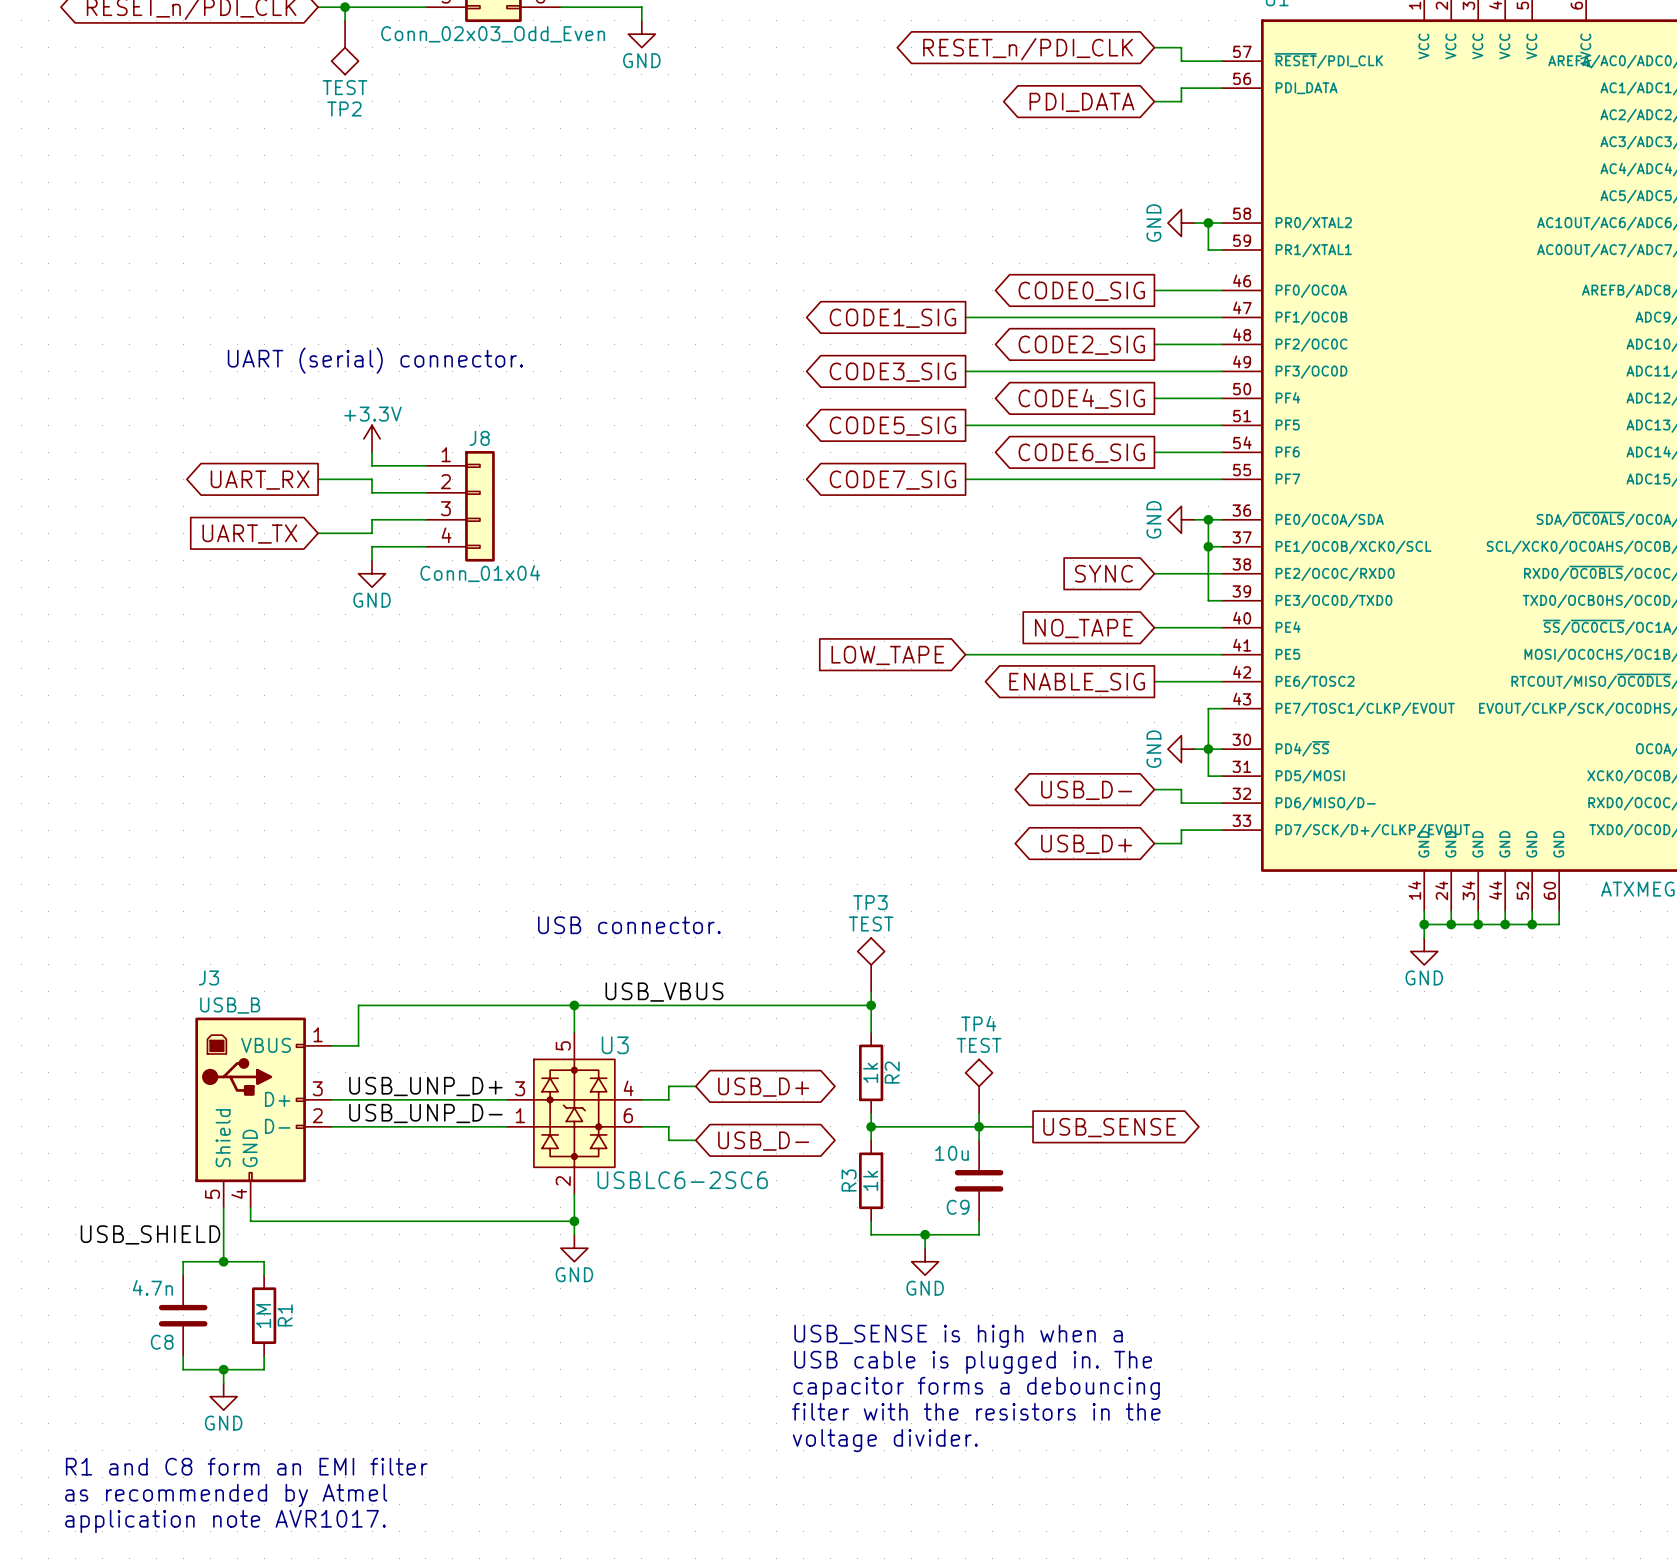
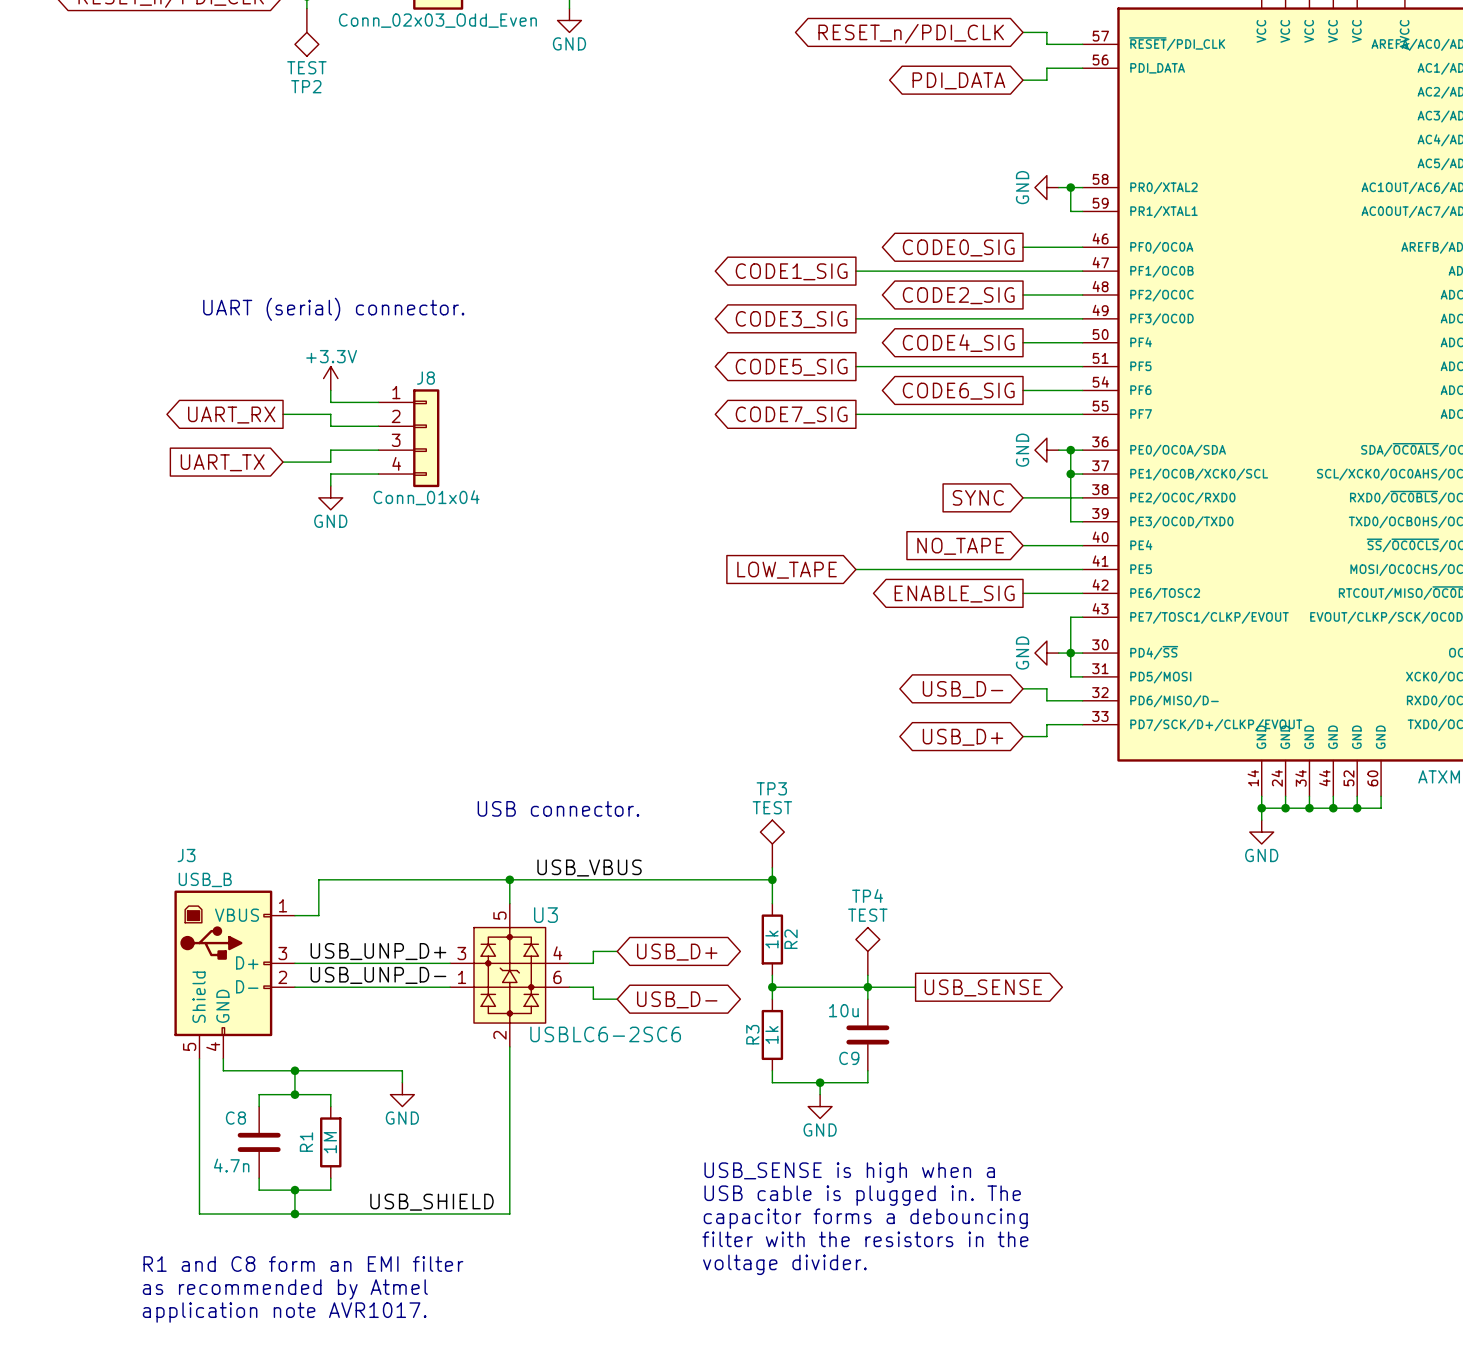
wire: none -> (294, 1070) (294, 1094)
junction: none -> (294, 1070)
wire: (452, 1221) (574, 1221) -> (402, 1070) (402, 1082)
junction: (574, 1221) -> none
label position: USB_SHIELD (150, 1234) -> USB_SHIELD (431, 1202)
wire: none -> (509, 1082) (509, 1214) (199, 1214)
junction: none -> (294, 1094)
power symbol position: GND (574, 1248) -> GND (402, 1094)
wire: none -> (199, 1106) (199, 1202)
junction: (223, 1261) -> none
wire: (183, 1275) (183, 1261) (264, 1261) (264, 1275) -> (259, 1106) (259, 1094) (330, 1094) (330, 1106)
C8 value position: 4.7n (152, 1287) -> 4.7n (231, 1165)
C8 position: (183, 1315) -> (259, 1142)
R1 position: (264, 1315) -> (330, 1142)
R1 name position: R1 (285, 1315) -> R1 (306, 1142)
C8 name position: C8 (162, 1342) -> C8 (235, 1118)
wire: (183, 1356) (183, 1369) (264, 1369) (264, 1356) -> (259, 1178) (259, 1190) (330, 1190) (330, 1178)
wire: none -> (294, 1190) (294, 1214)
junction: none -> (294, 1190)
junction: (223, 1369) -> none
junction: none -> (294, 1214)
power symbol: GND (223, 1396) -> none
text position: R1 and C8 form an EMI filter (246, 1466) -> R1 and C8 form an EMI filter (303, 1264)
text position: as recommended by Atmel (226, 1495) -> as recommended by Atmel (285, 1289)
text position: application note AVR1017. (225, 1521) -> application note AVR1017. (284, 1312)

